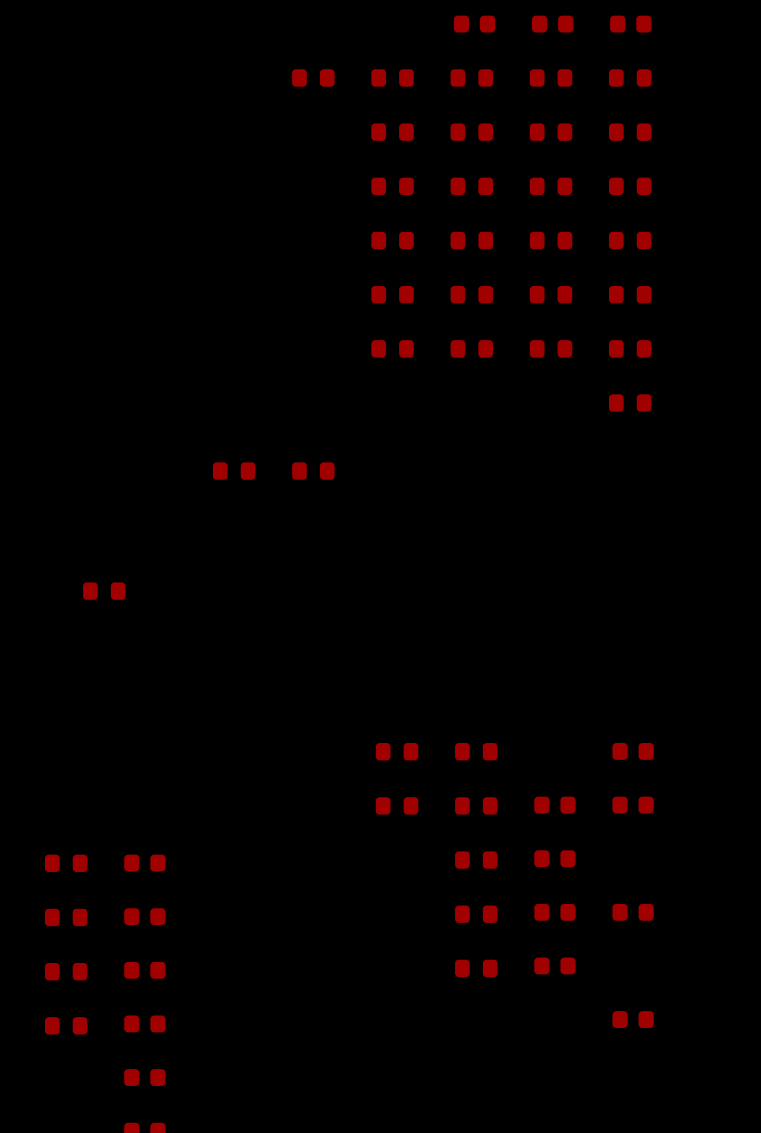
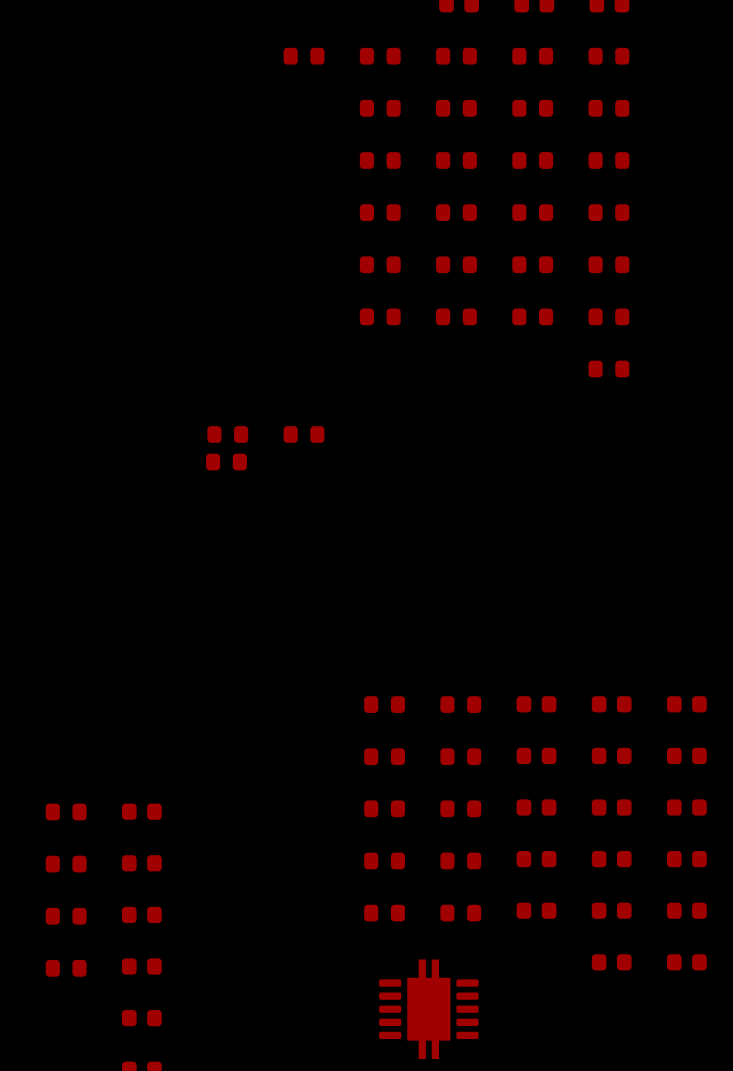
part position: (104, 591) -> (226, 461)
part: none -> (536, 704)
part: none -> (686, 704)
part: none -> (686, 755)
part: none -> (611, 807)
part: none -> (686, 807)
part: none -> (384, 808)
part: none -> (686, 859)
part: none -> (384, 860)
part: none -> (611, 910)
part: none -> (686, 910)
part: none -> (384, 913)
part: none -> (686, 962)
part: none -> (428, 1009)

